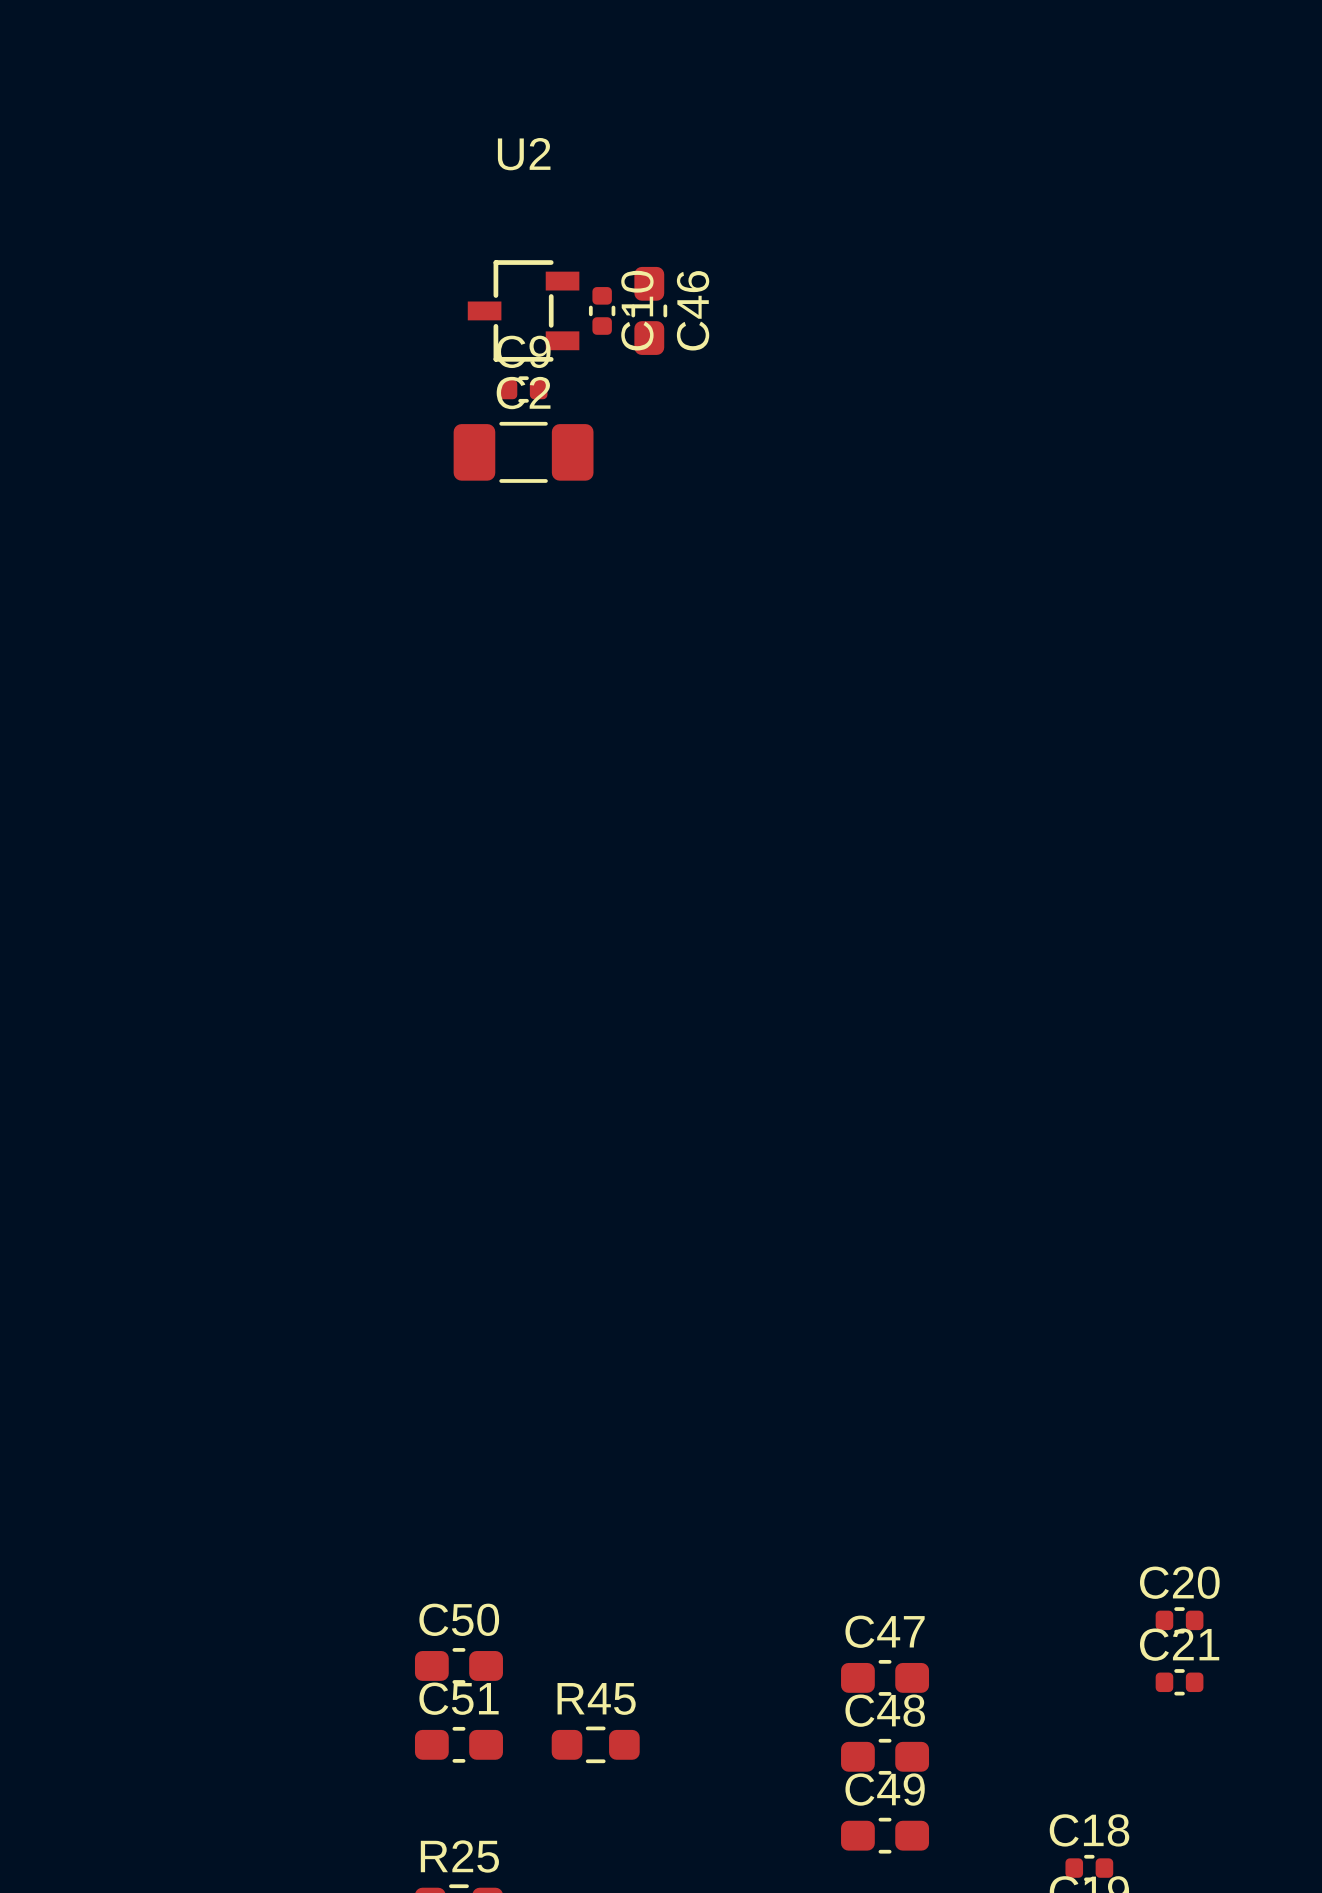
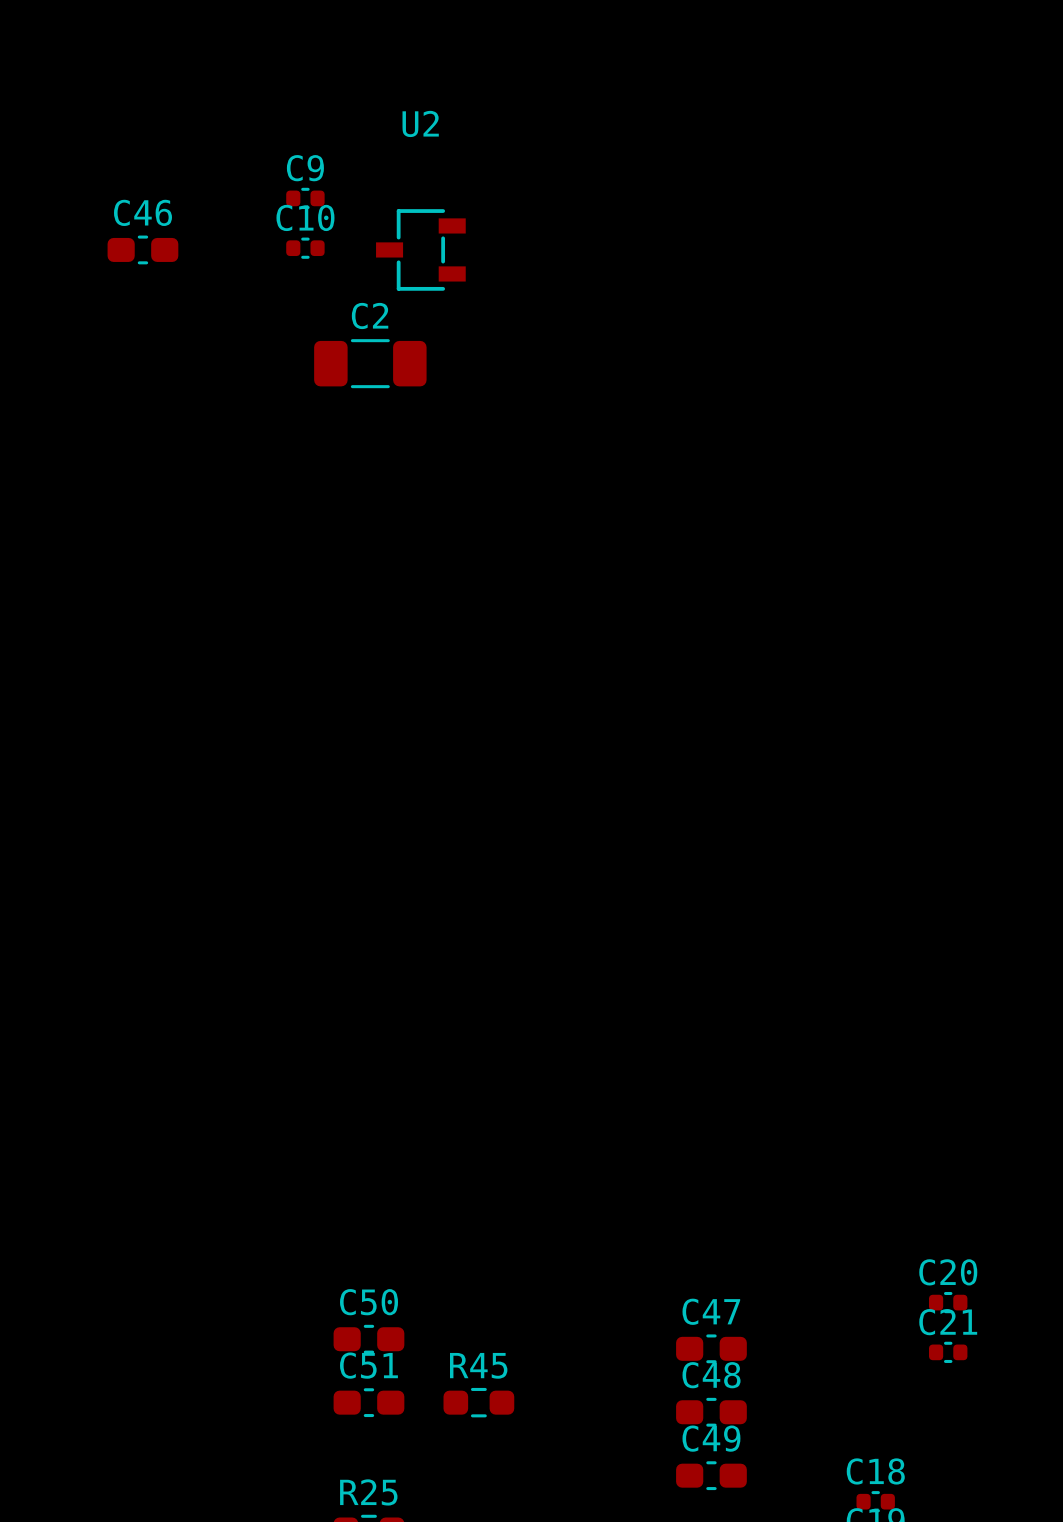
C10 rotation: 0° (602, 310) -> 90° clockwise (305, 248)
C10 position: (602, 310) -> (305, 248)
C46 rotation: 0° (649, 310) -> 90° clockwise (142, 249)
C46 position: (649, 310) -> (142, 249)
C46 name position: C46 (693, 310) -> C46 (142, 212)
C9 position: (523, 389) -> (305, 198)
C2 position: (523, 452) -> (370, 363)

